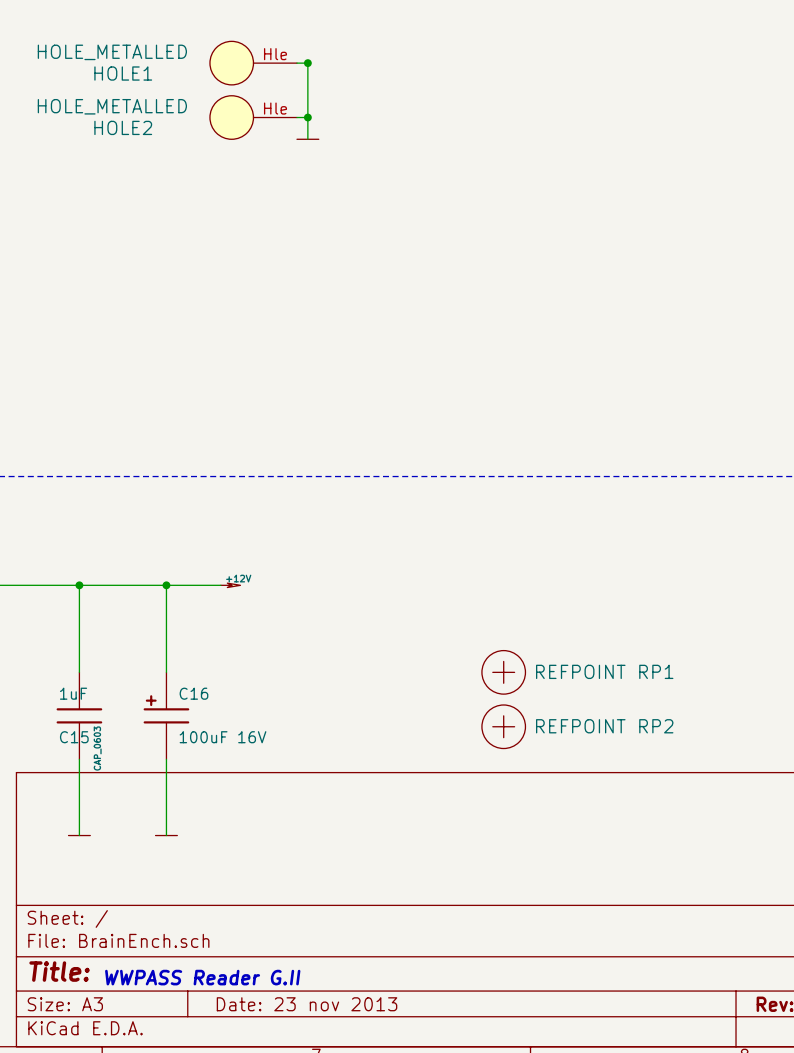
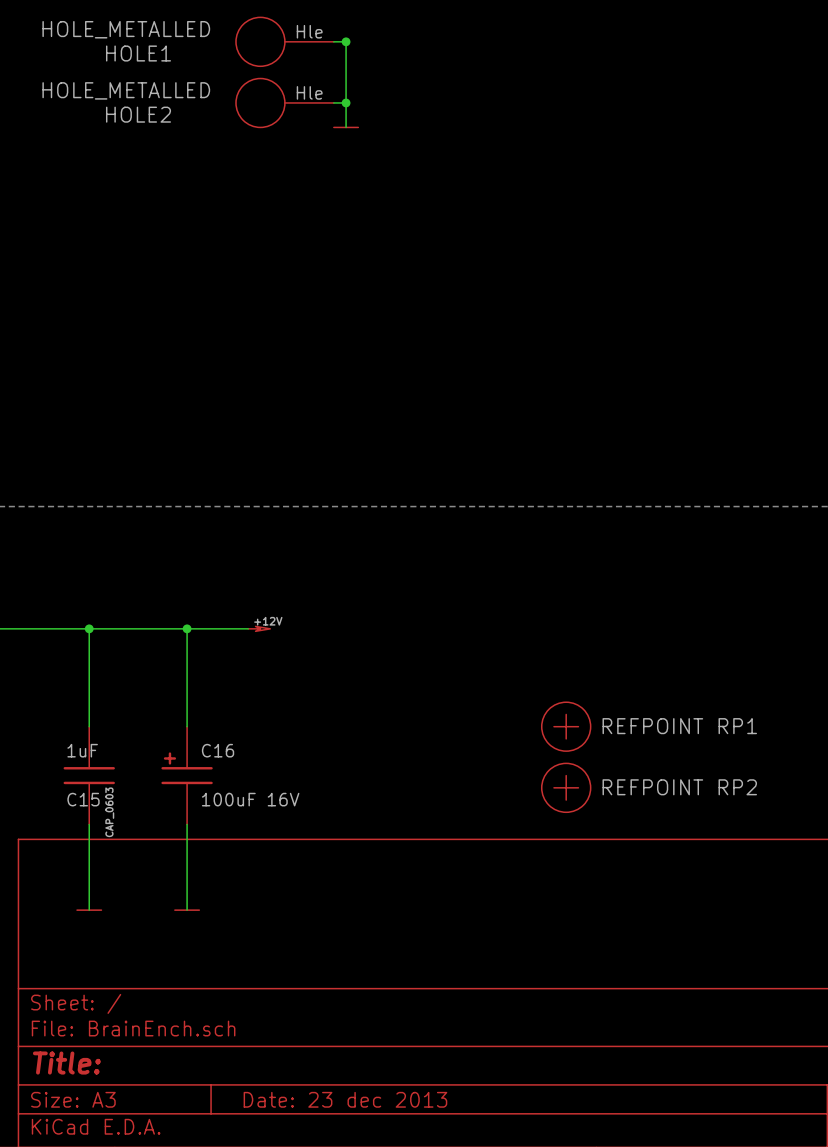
text: WWPASS Reader G.II (202, 977) -> none
title block: Date: 23 nov 2013 (307, 1004) -> Date: 23 dec 2013 (345, 1099)

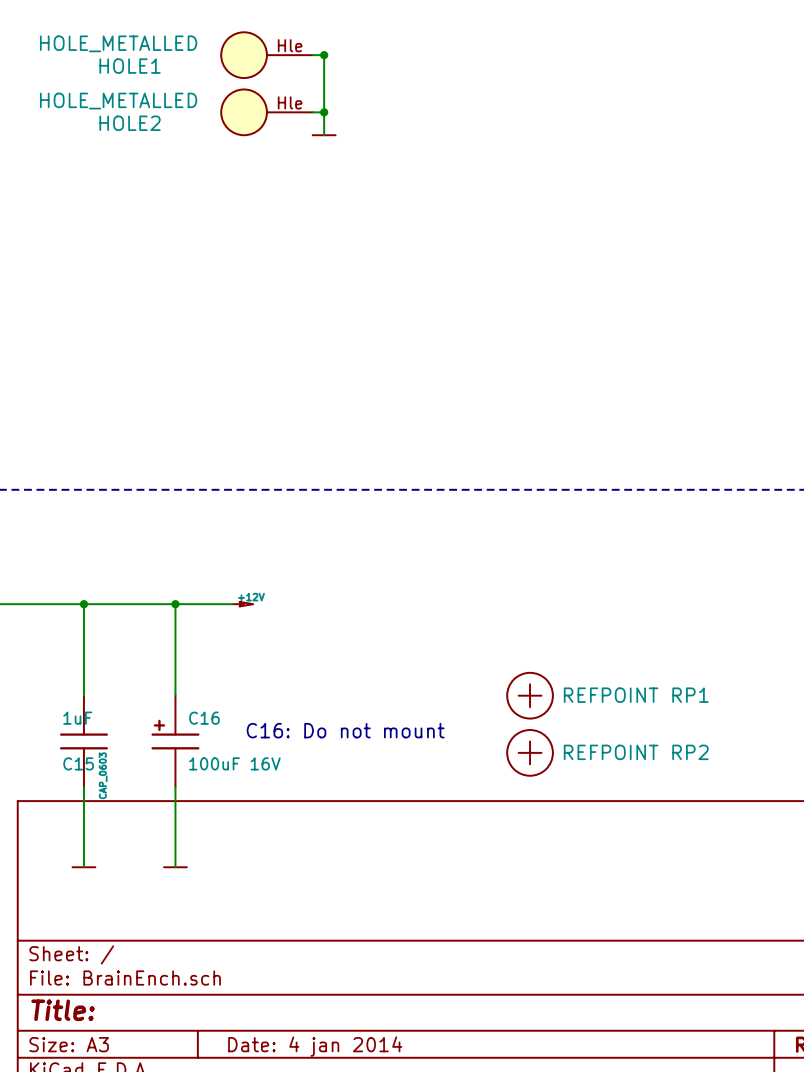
text: none -> C16: Do not mount (345, 730)
title block: Date: 23 dec 2013 (345, 1099) -> Date: 4 jan 2014 (315, 1046)

